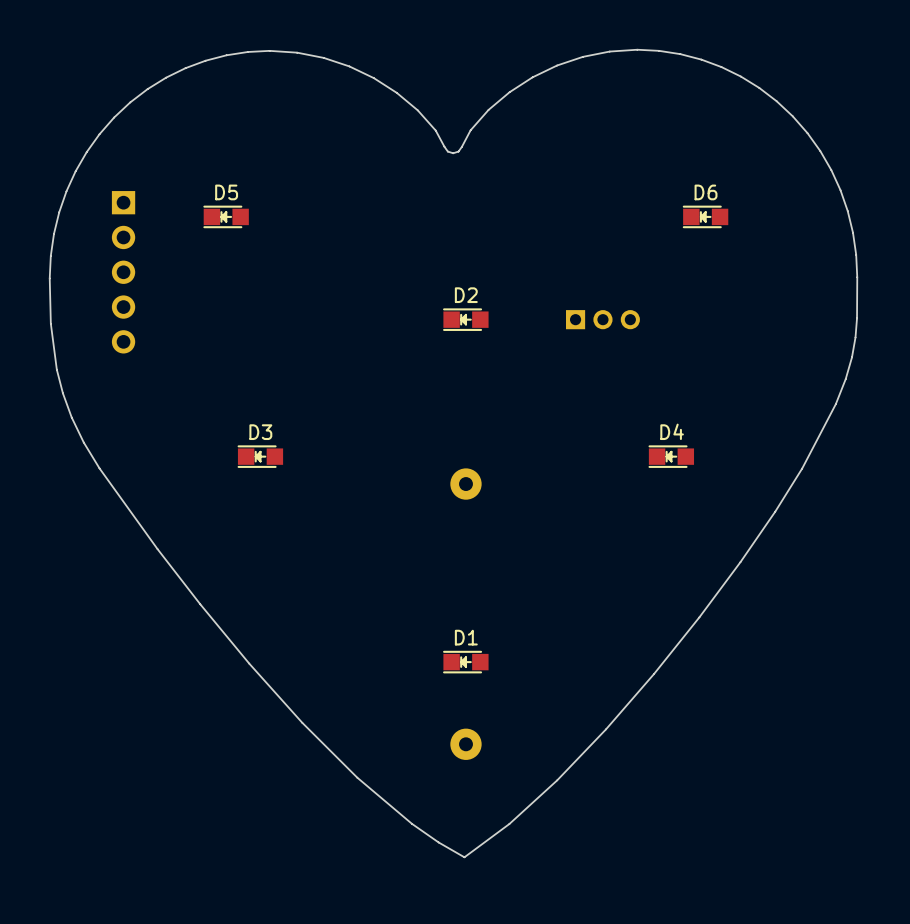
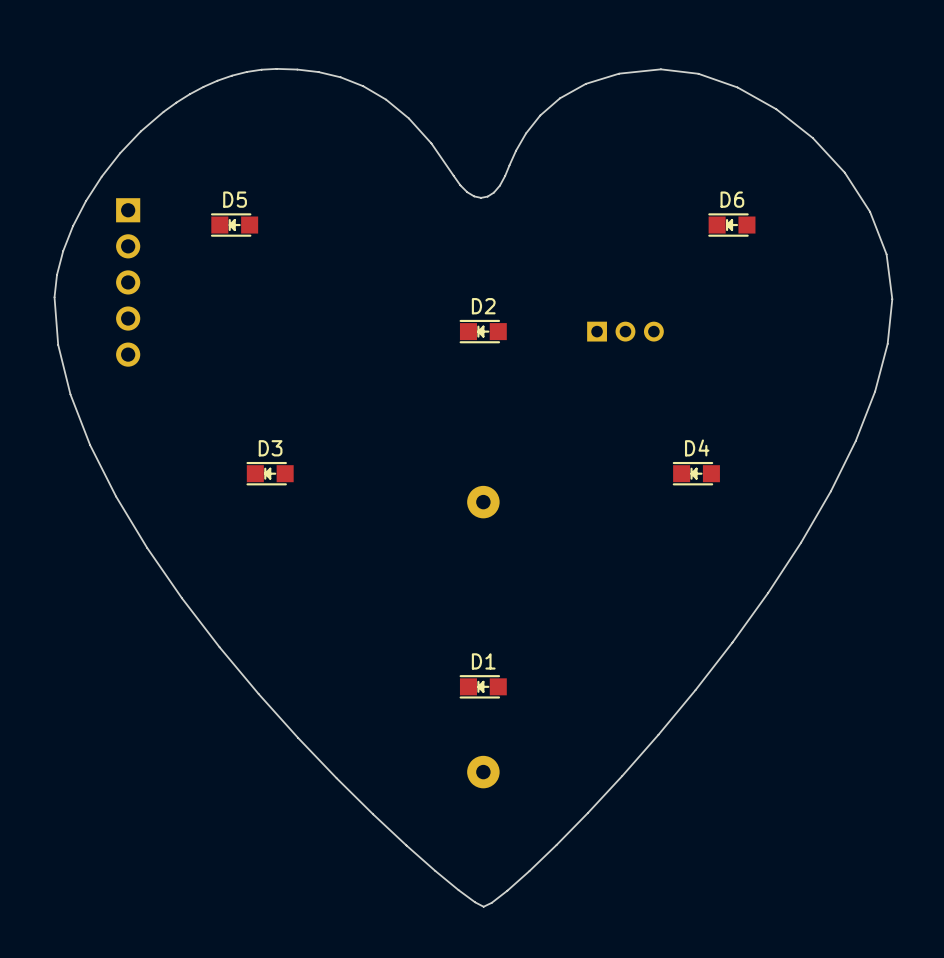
board edge: (637, 49) (680, 54) (701, 59) (740, 76) (776, 101) (792, 116) (820, 151) (840, 190) (853, 232) (857, 277) (857, 318) (852, 357) (835, 404) (802, 468) (740, 562) (699, 617) (606, 729) (557, 780) (509, 823) (464, 857) (412, 823) (357, 777) (302, 722) (249, 663) (200, 604) (99, 468) (71, 417) (56, 369) (50, 323) (49, 278) (54, 233) (59, 212) (75, 171) (99, 134) (114, 117) (147, 89) (166, 77) (205, 60) (247, 51) (269, 50) (297, 52) (323, 57) (349, 66) (373, 78) (396, 92) (417, 110) (435, 130) (447, 151) (453, 153) (458, 151) (470, 130) (488, 109) (509, 92) (532, 77) (557, 65) (582, 56) (609, 51) (637, 49) -> (276, 68) (318, 72) (340, 77) (363, 86) (386, 99) (408, 118) (431, 143) (460, 185) (467, 192) (481, 197) (494, 192) (499, 185) (526, 133) (540, 115) (559, 98) (585, 83) (619, 73) (660, 69) (698, 73) (737, 87) (776, 109) (812, 138) (844, 172) (870, 211) (886, 254) (892, 299) (887, 343) (875, 391) (855, 440) (830, 491) (801, 542) (732, 642) (658, 734) (556, 845) (507, 890) (483, 906) (458, 890) (435, 870) (336, 778) (258, 694) (182, 598) (147, 547) (116, 496) (90, 445) (70, 394) (58, 344) (54, 297) (57, 274) (63, 250) (85, 201) (120, 153) (140, 131) (163, 111) (189, 94) (232, 75) (276, 68)

